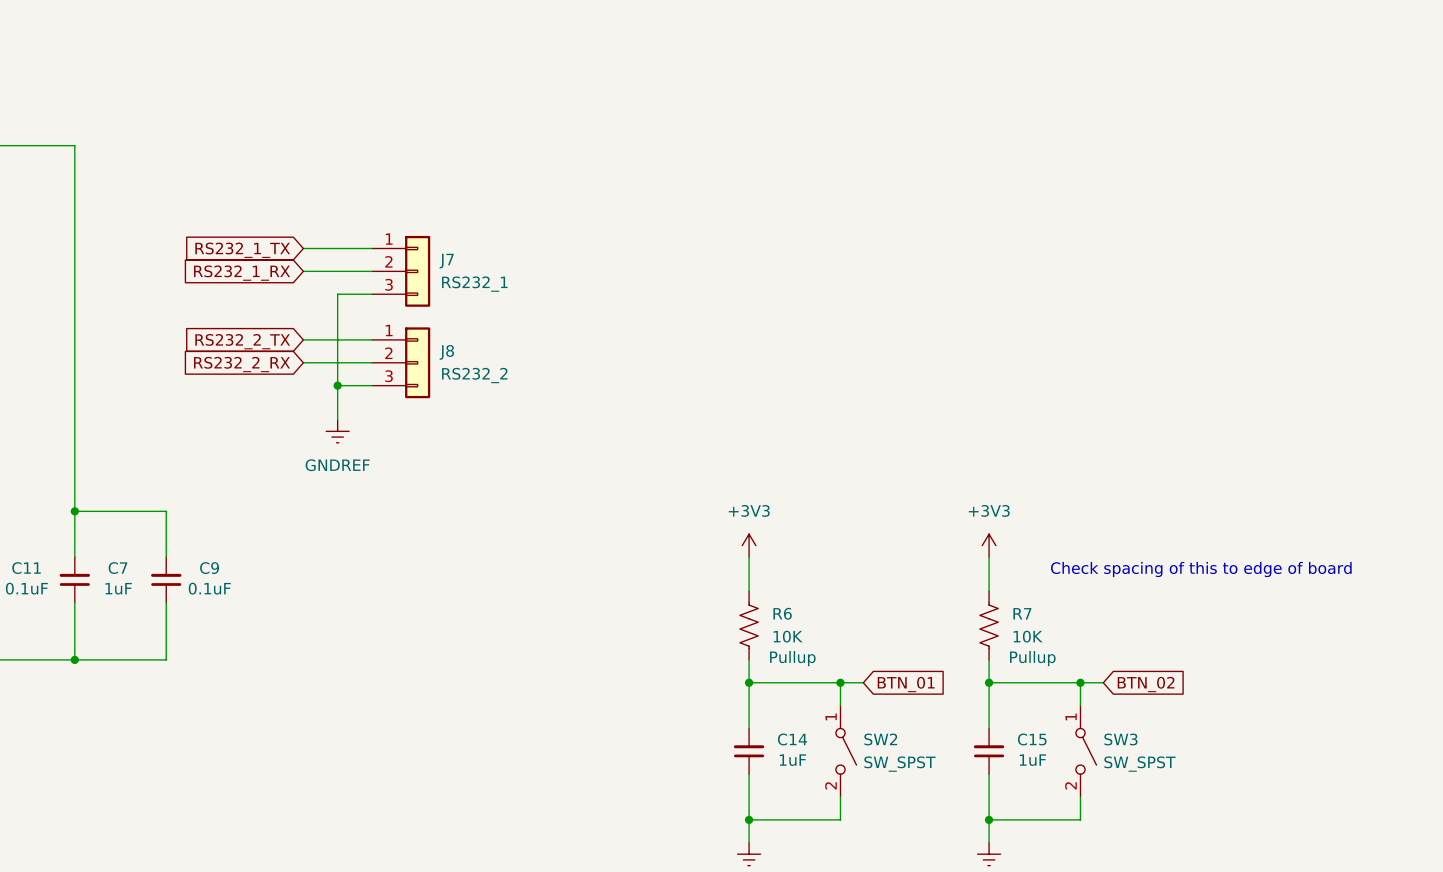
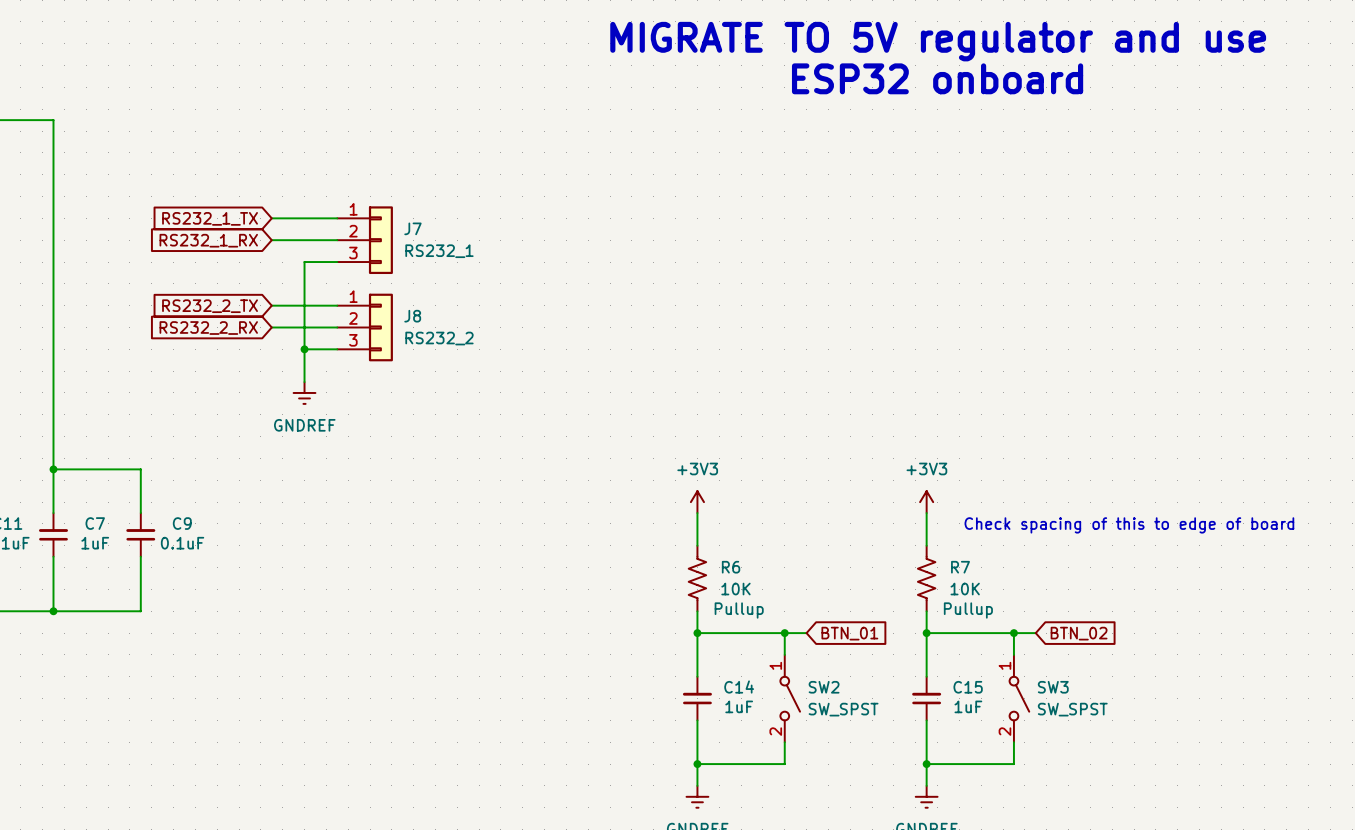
text: none -> MIGRATE TO 5V regulator and use (938, 41)
text: none -> ESP32 onboard (937, 78)

